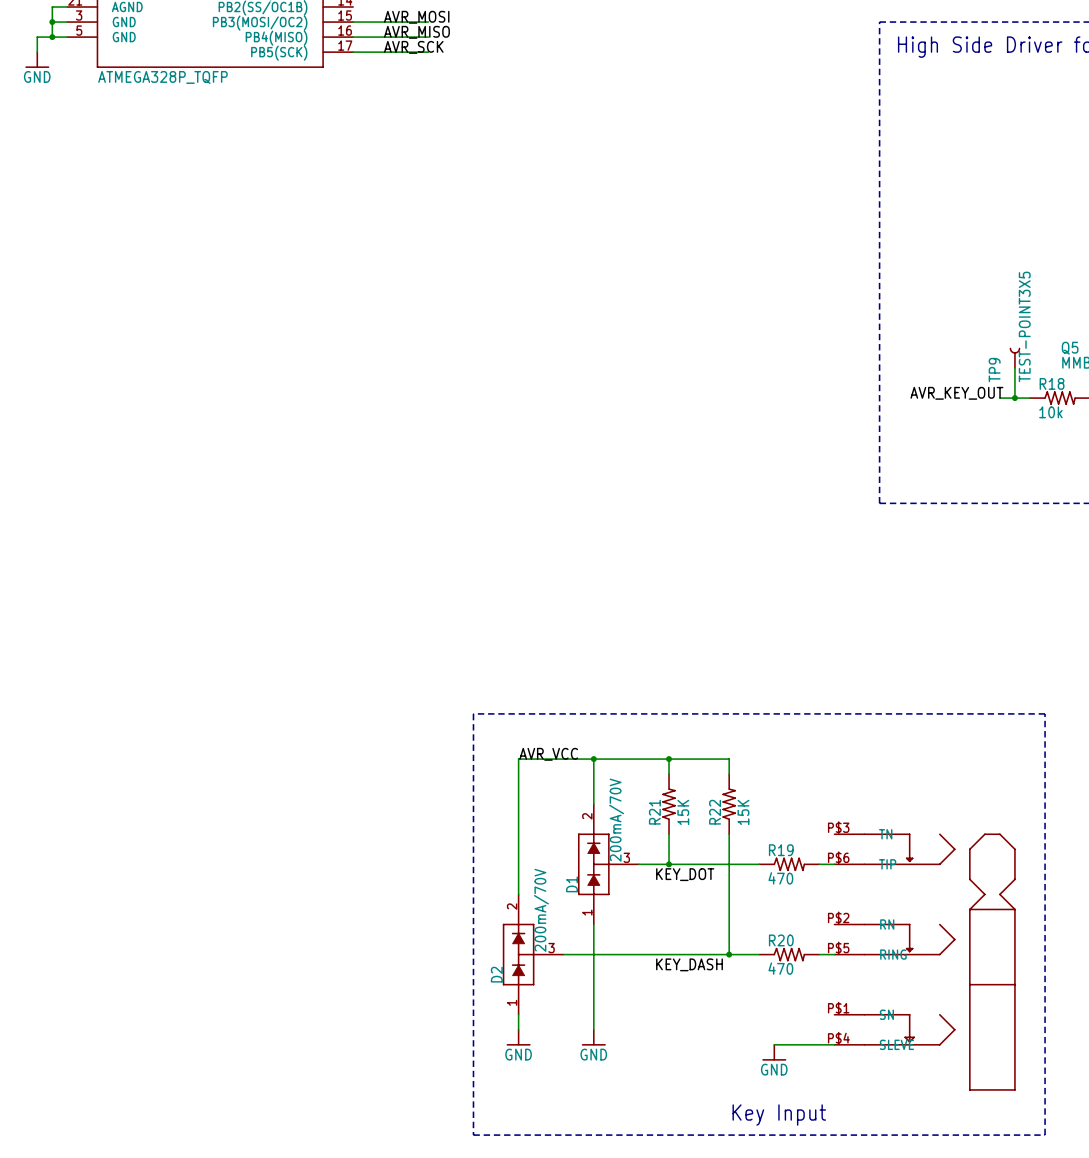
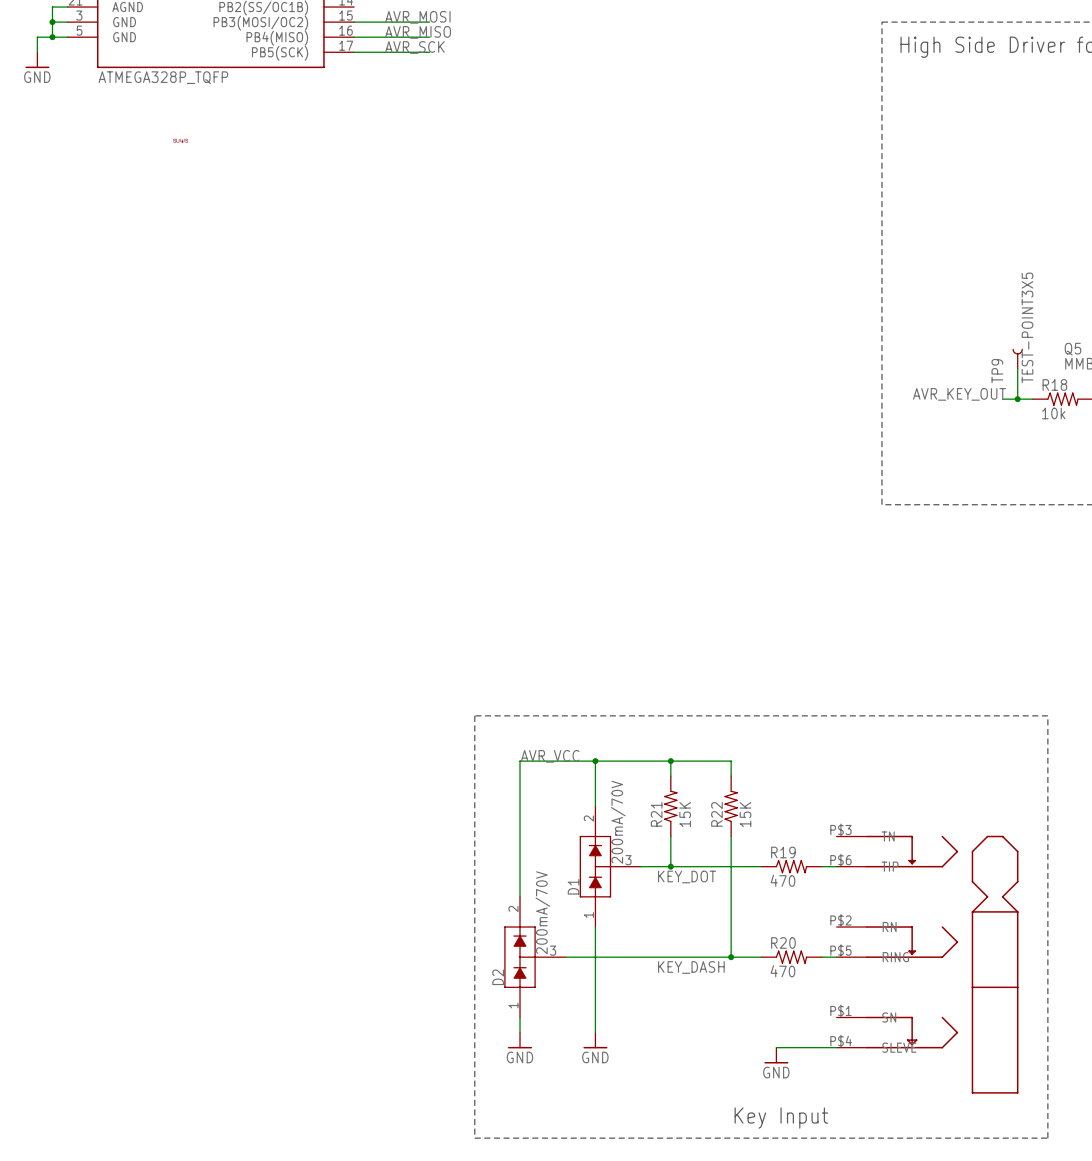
part: none -> (180, 140)

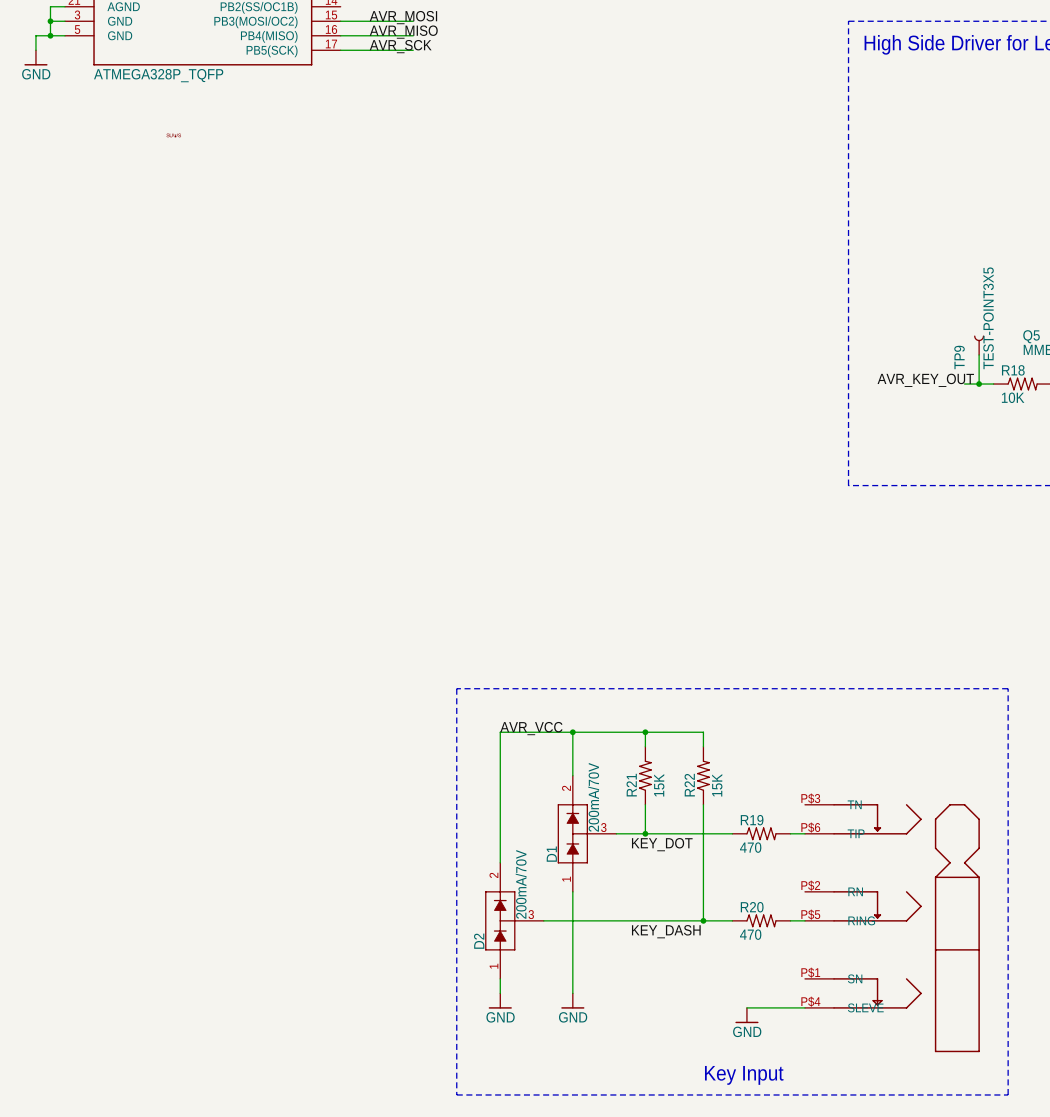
R18 value: 10k (1053, 413) -> 10K (1013, 397)

